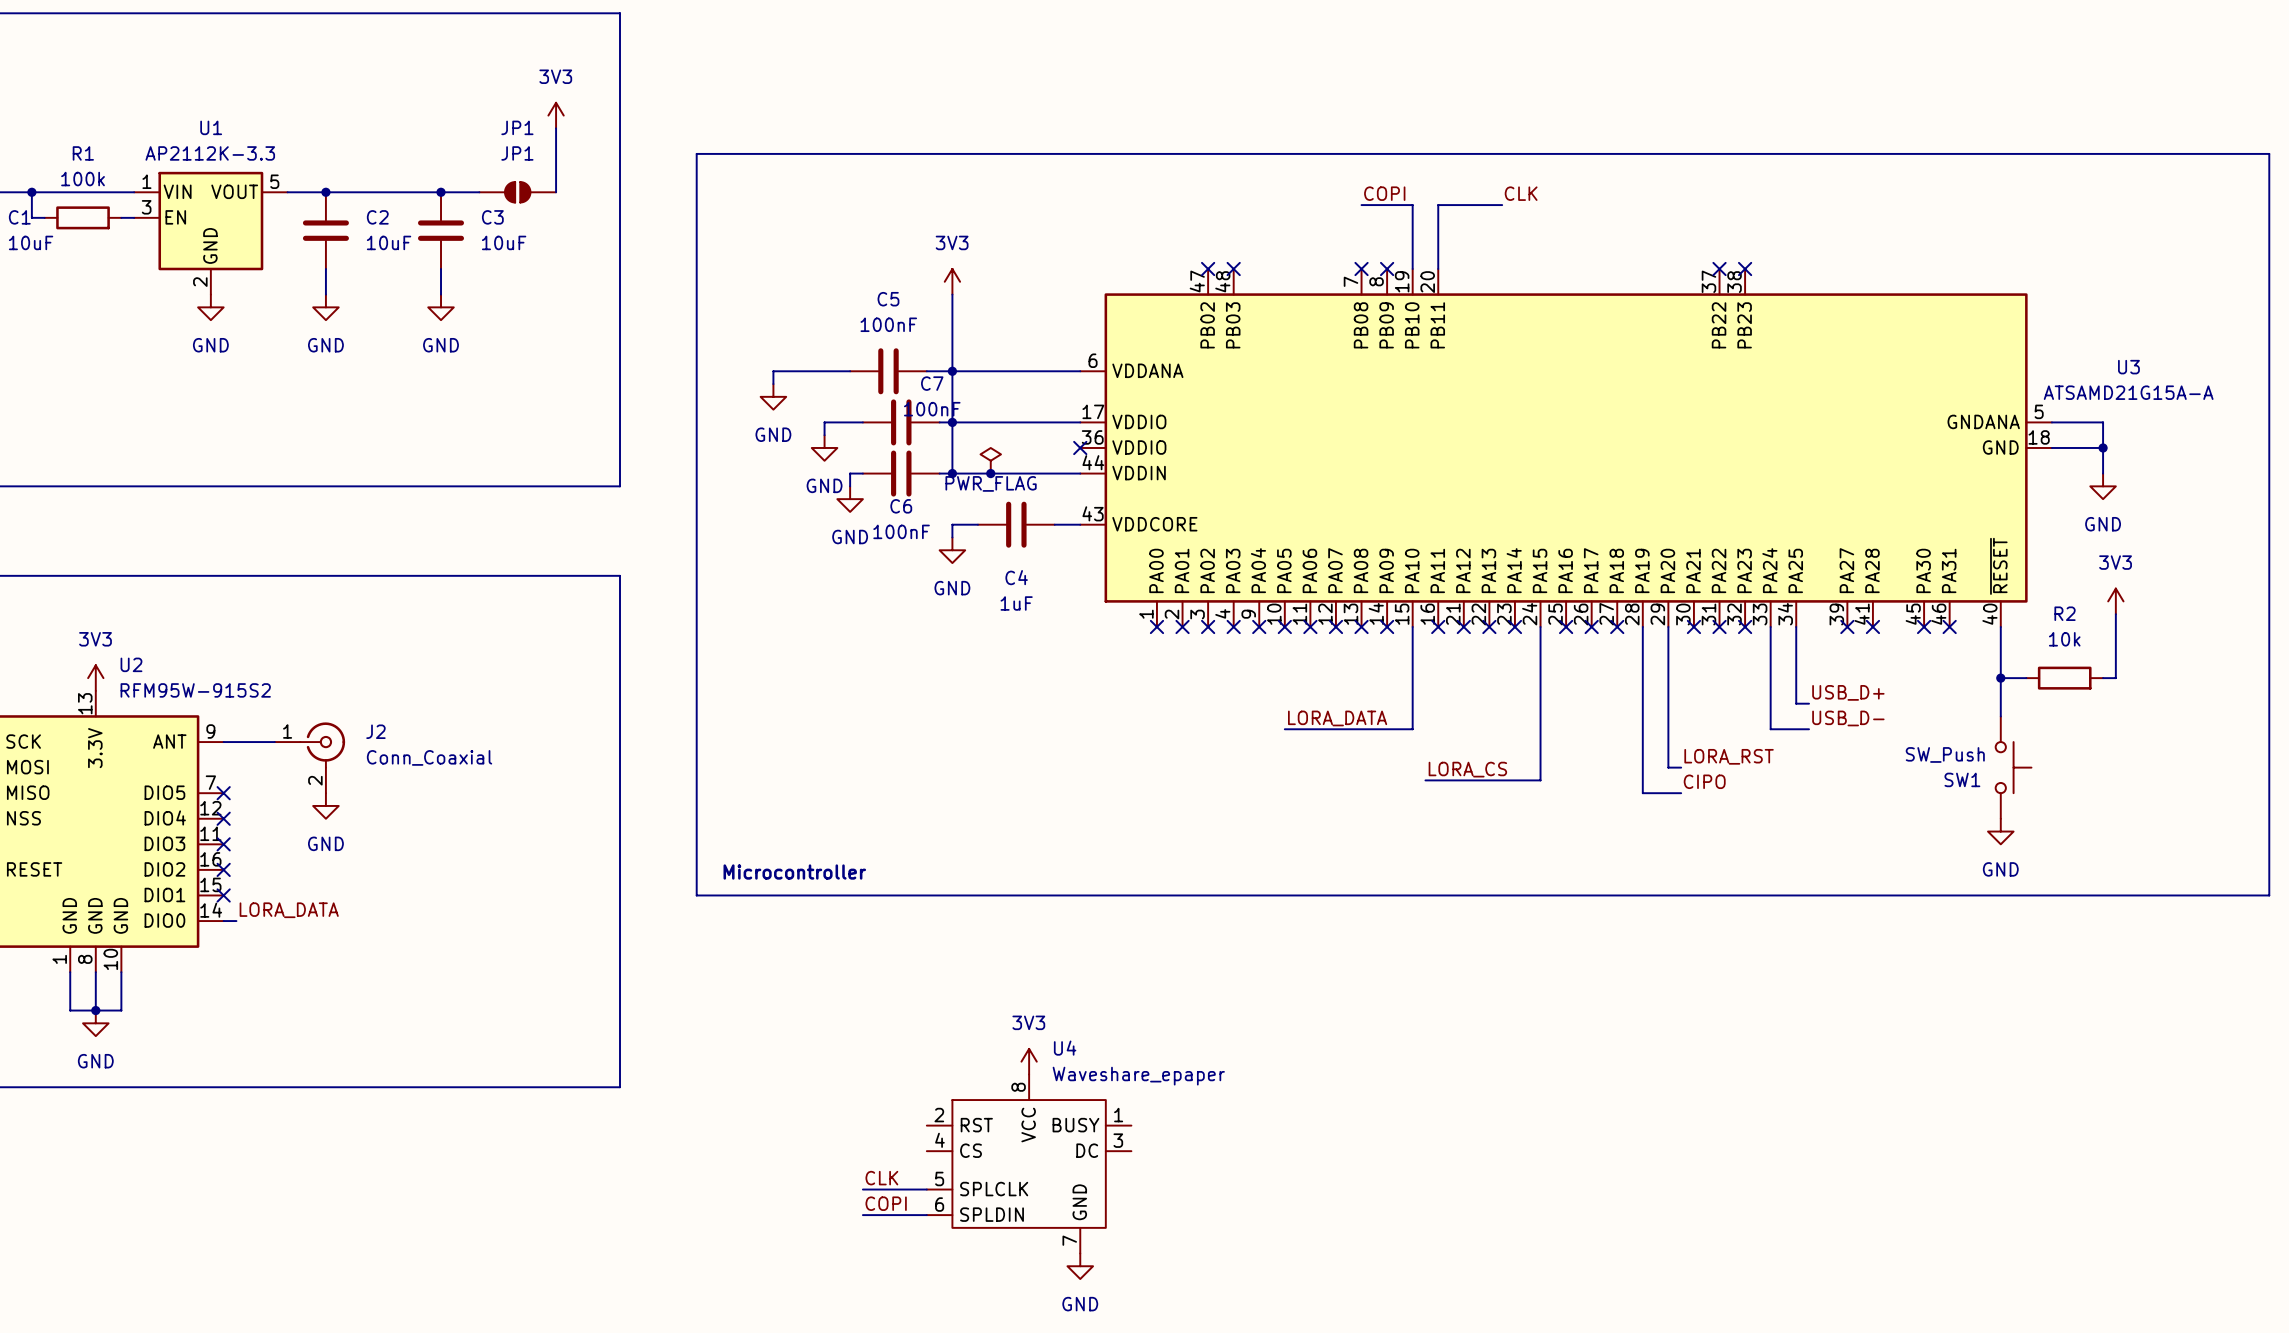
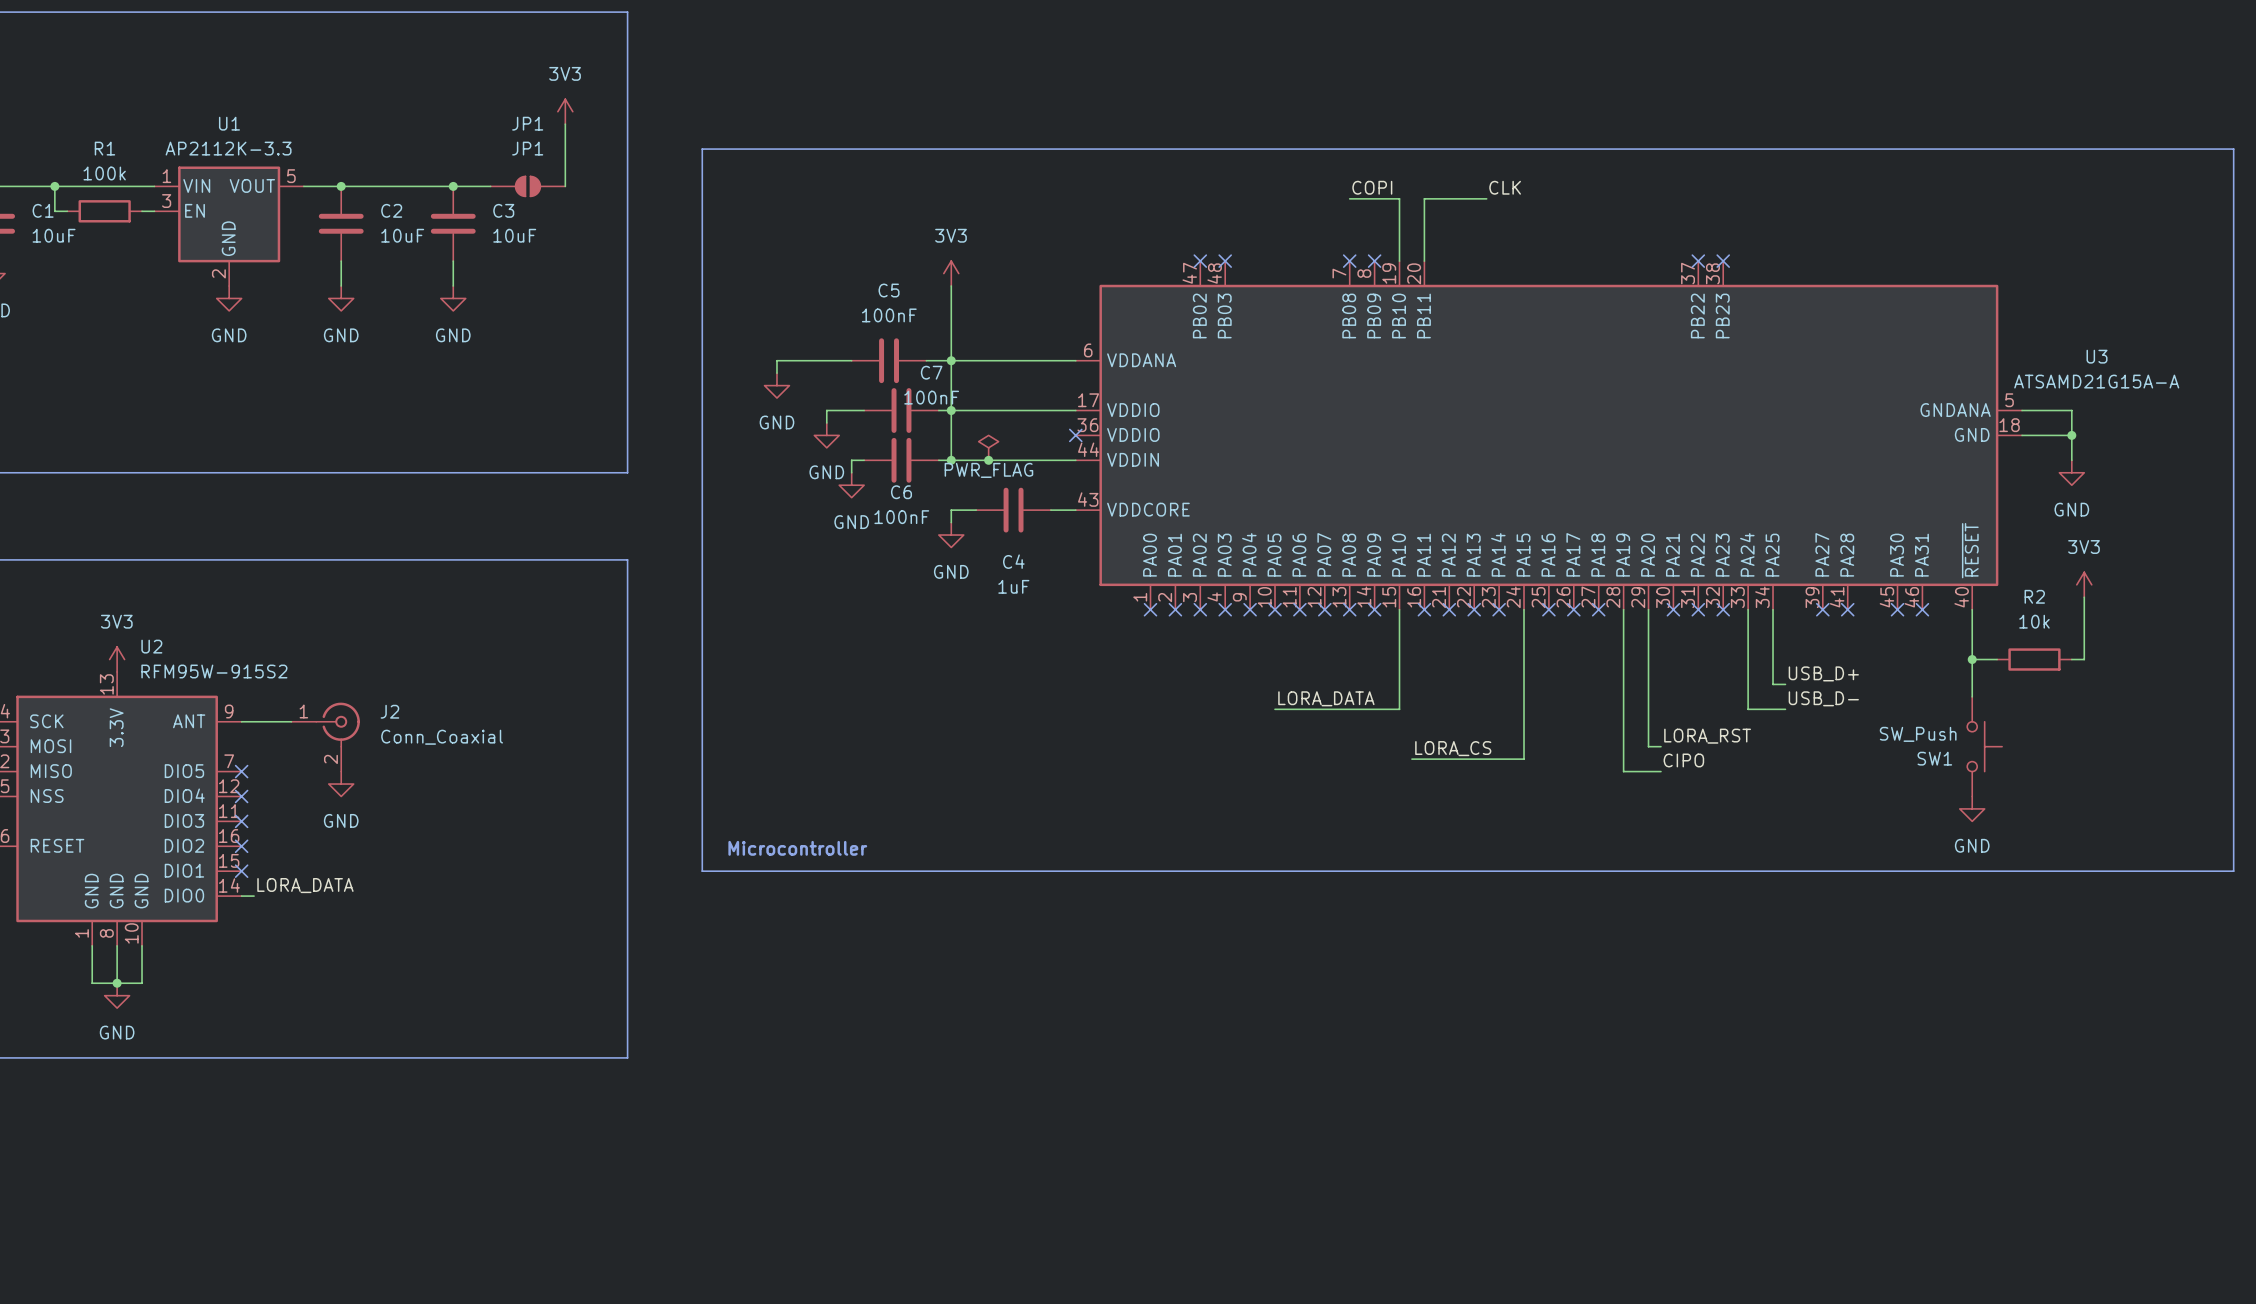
power symbol: 3V3 (1029, 1061) -> none
U4: Waveshare_epaper (1029, 1163) -> none
label: CLK (881, 1178) -> none
wire: (862, 1189) (926, 1189) -> none
label: COPI (886, 1203) -> none
wire: (862, 1215) (926, 1215) -> none
power symbol: GND (1080, 1266) -> none

